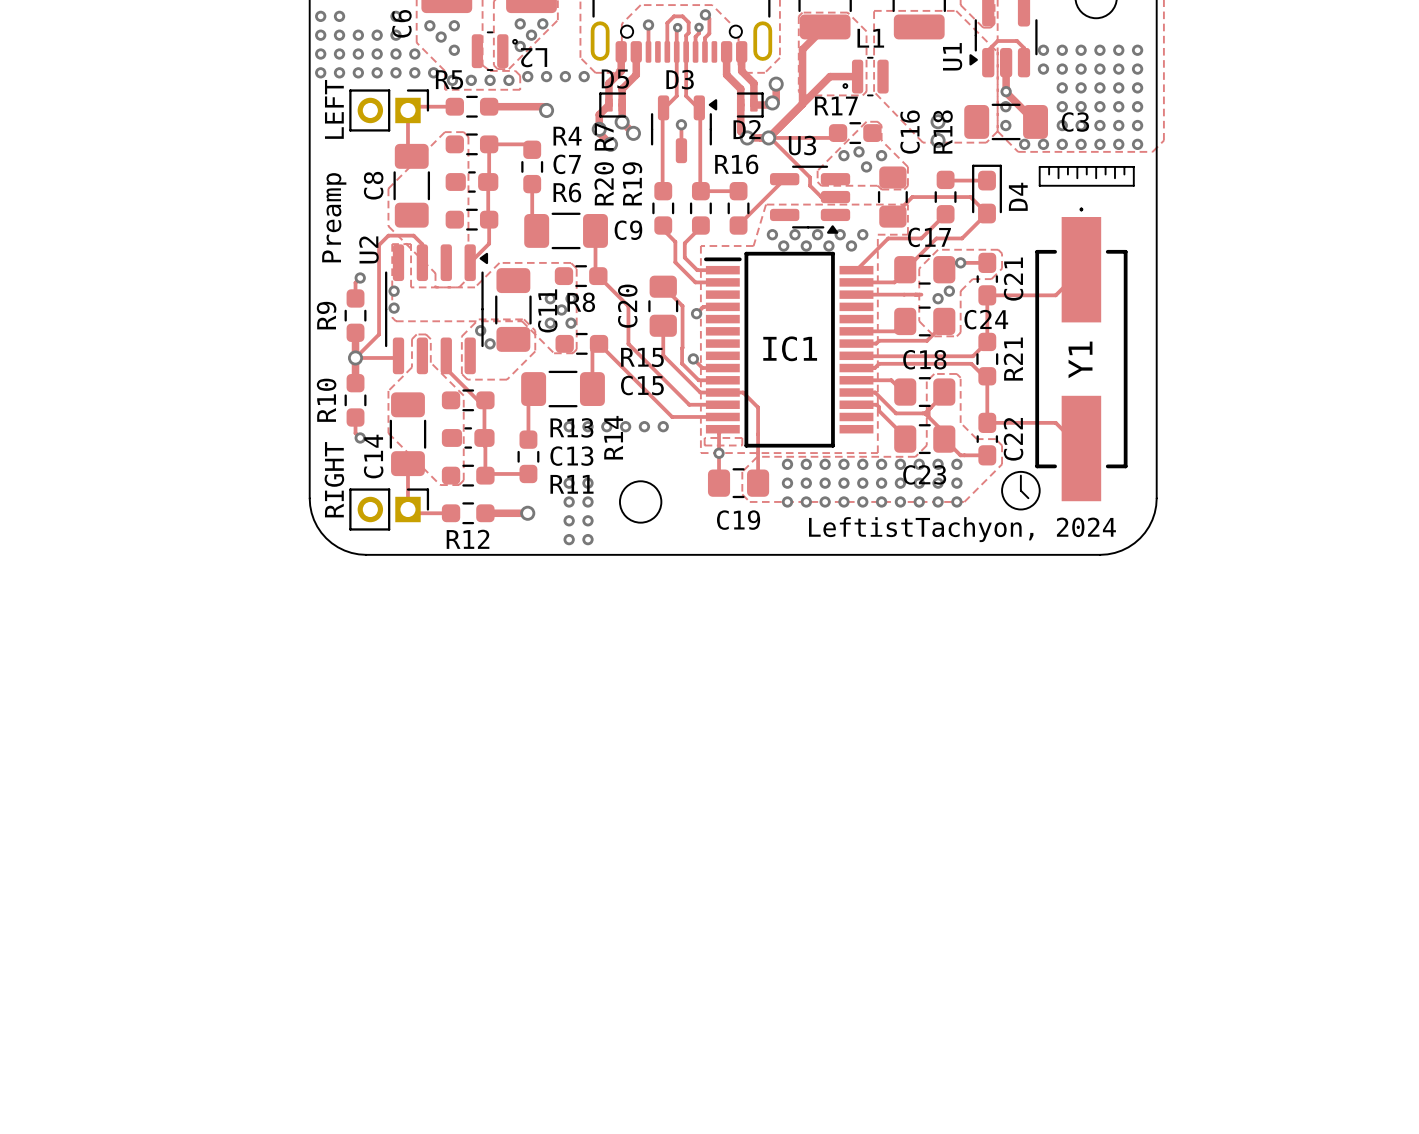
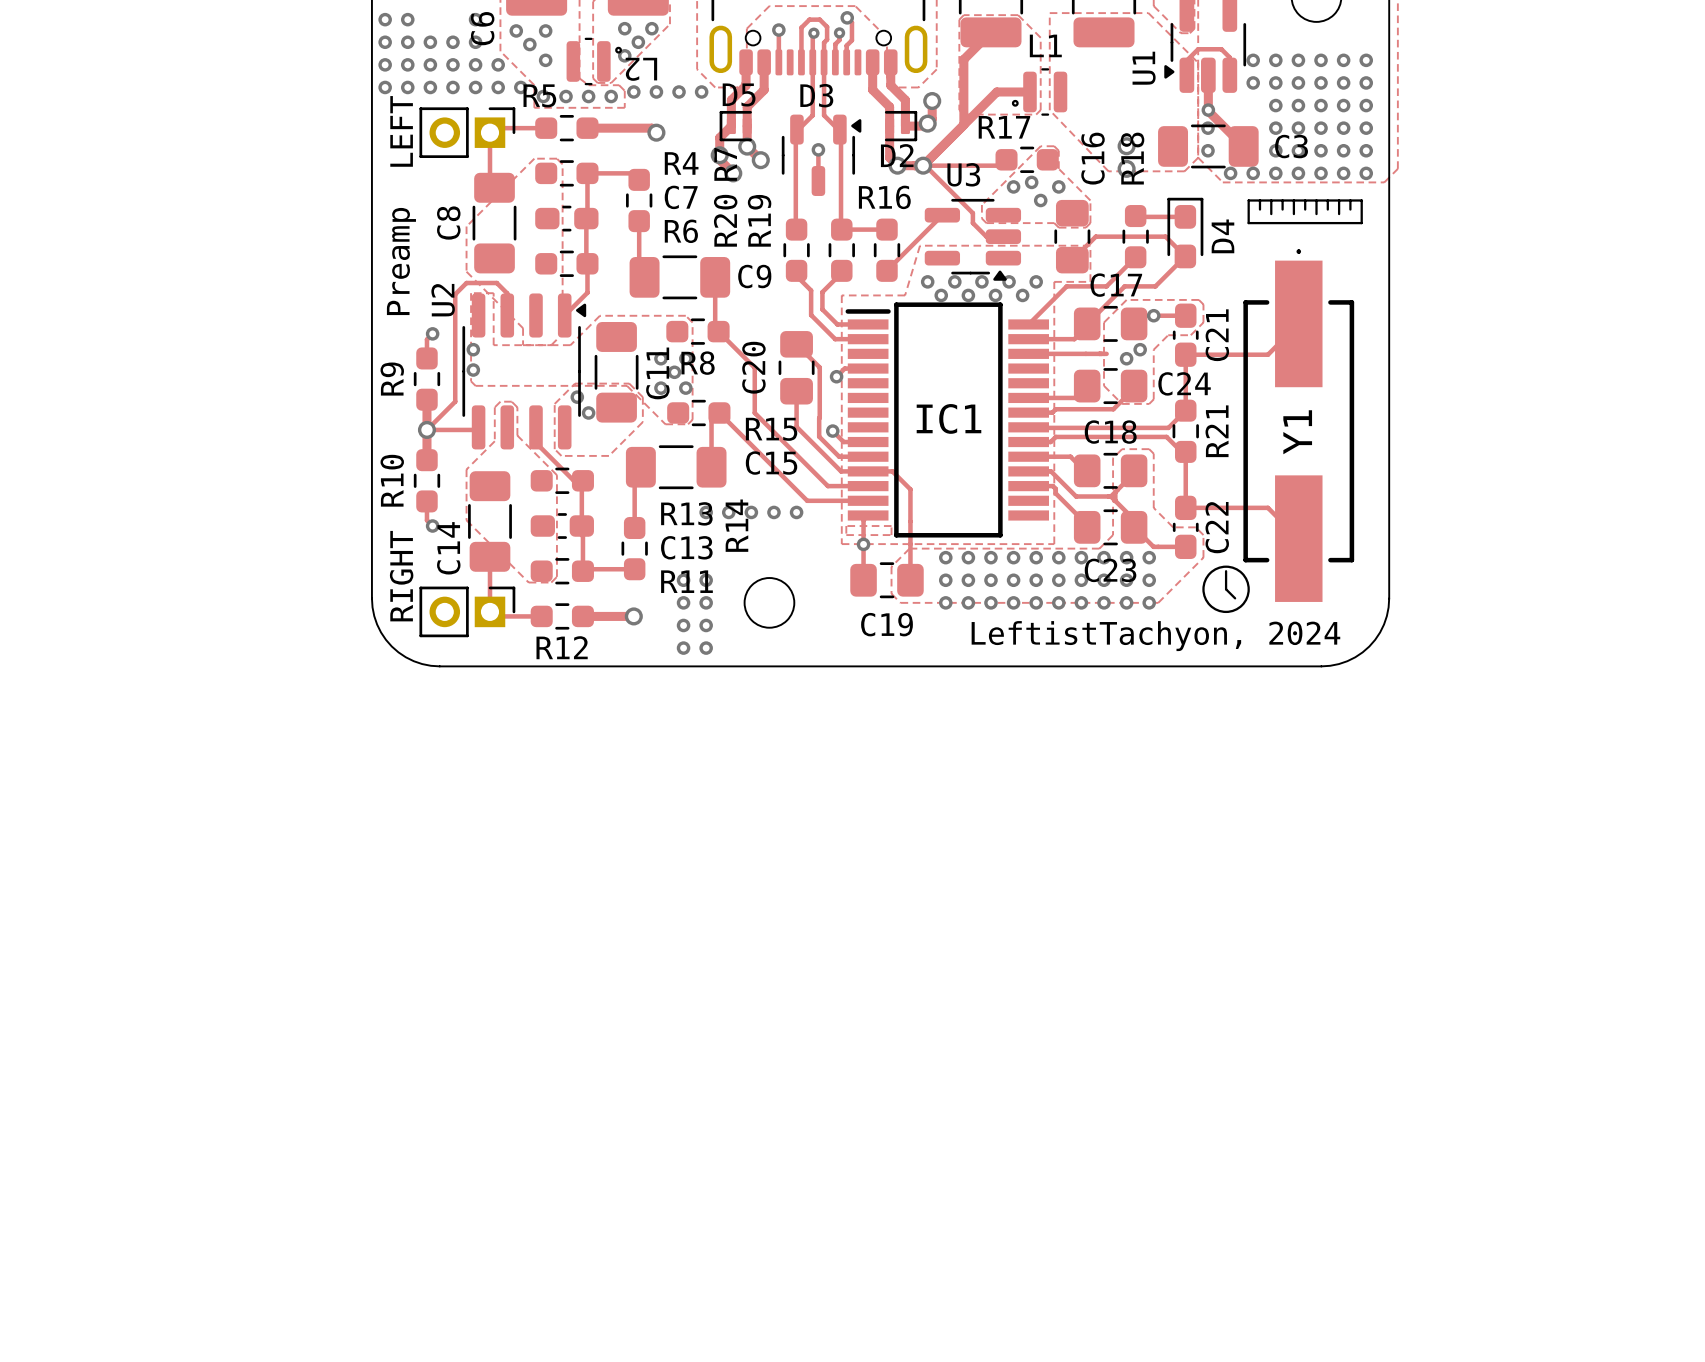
via: (569, 426) -> none

